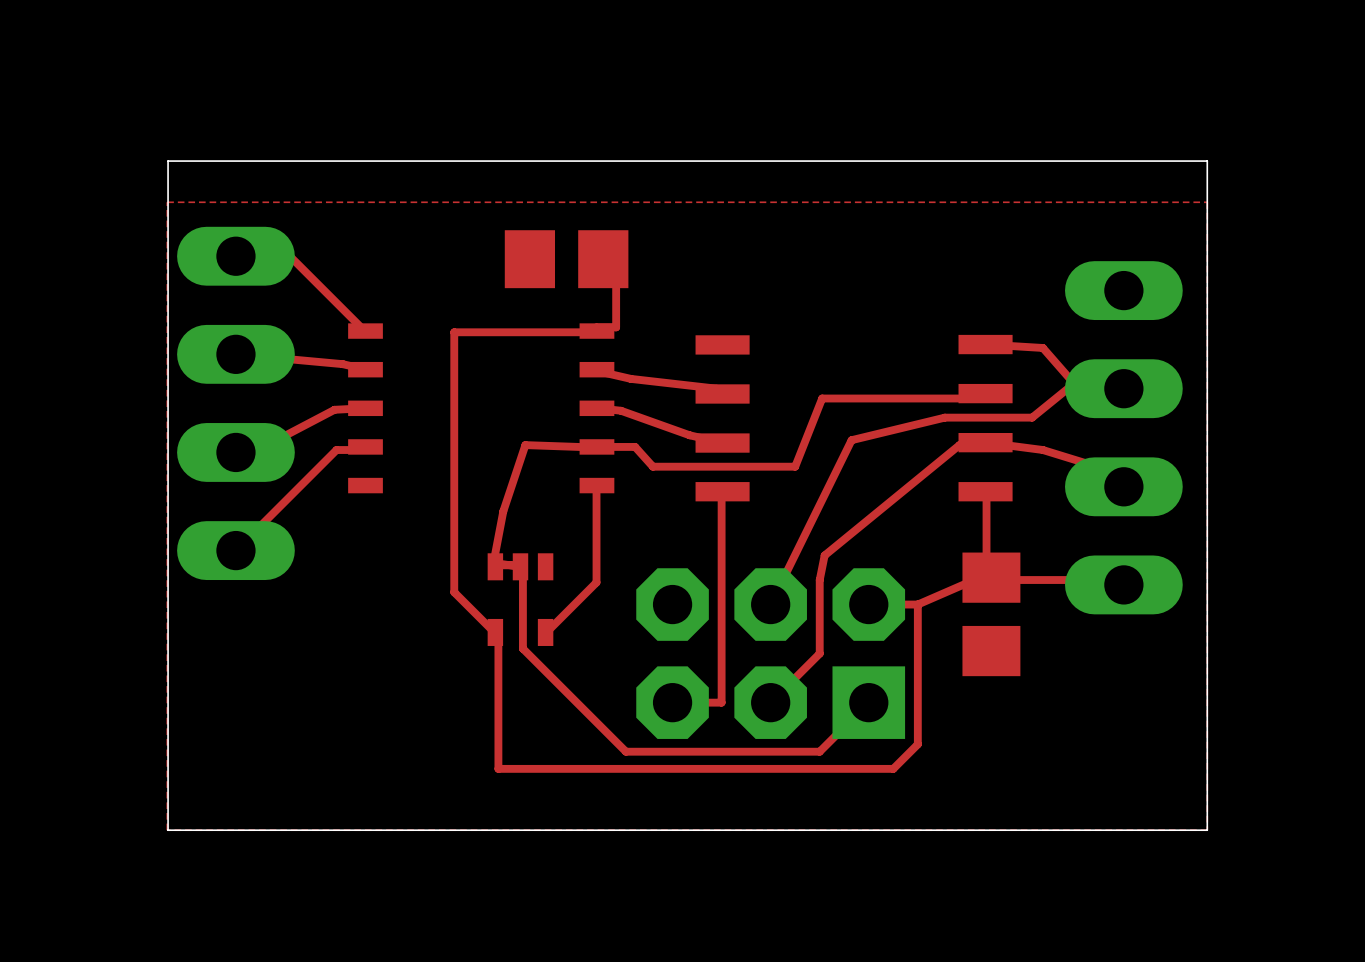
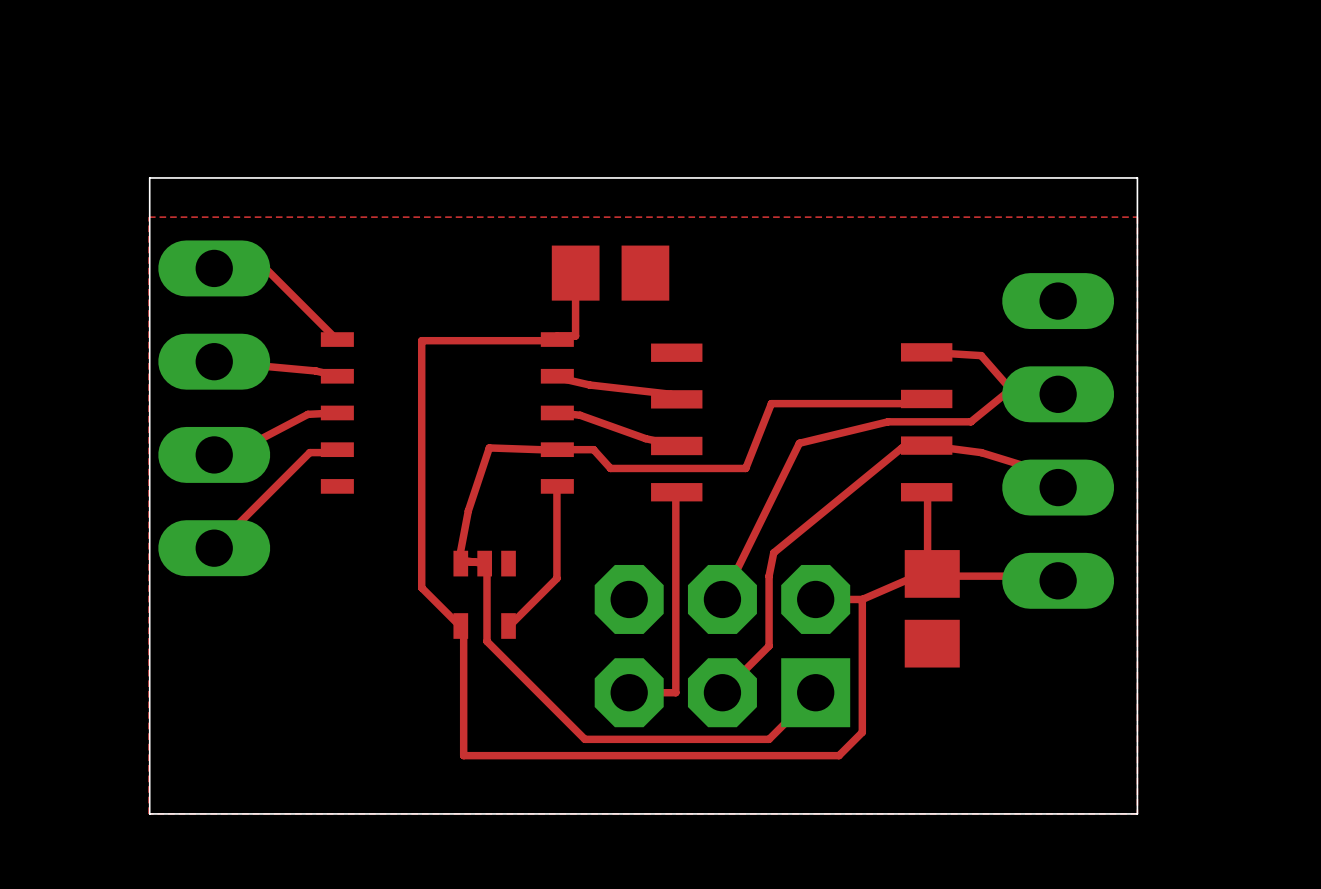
part position: (566, 259) -> (610, 273)

